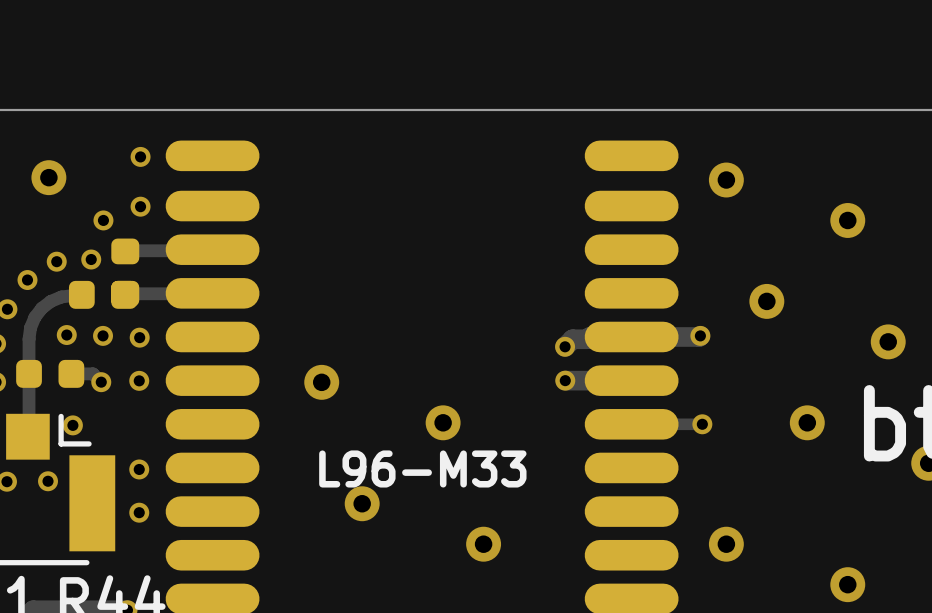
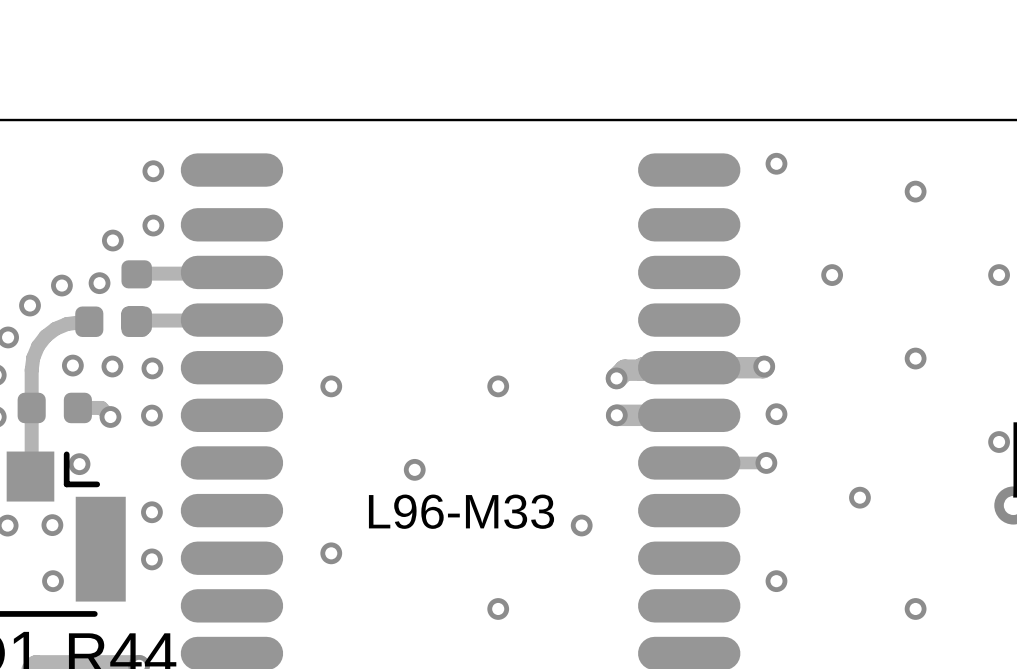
via: none -> (776, 163)
via: none -> (915, 191)
via: (48, 177) -> none
via: (726, 180) -> none
via: (847, 220) -> none
via: none -> (832, 275)
via: none -> (999, 275)
via: (766, 301) -> none
via: none -> (915, 358)
via: (888, 341) -> none
via: none -> (331, 386)
via: none -> (498, 386)
via: none -> (776, 414)
via: (321, 382) -> none
via: none -> (999, 442)
via: (443, 422) -> none
via: (807, 422) -> none
via: none -> (414, 469)
via: none -> (859, 497)
via: none -> (581, 525)
via: (362, 503) -> none
via: none -> (331, 553)
via size: [708, 526, 744, 562] -> [765, 570, 788, 593]
via: none -> (53, 581)
via position: (483, 544) -> (498, 608)
via size: [830, 567, 866, 603] -> [904, 598, 927, 620]

